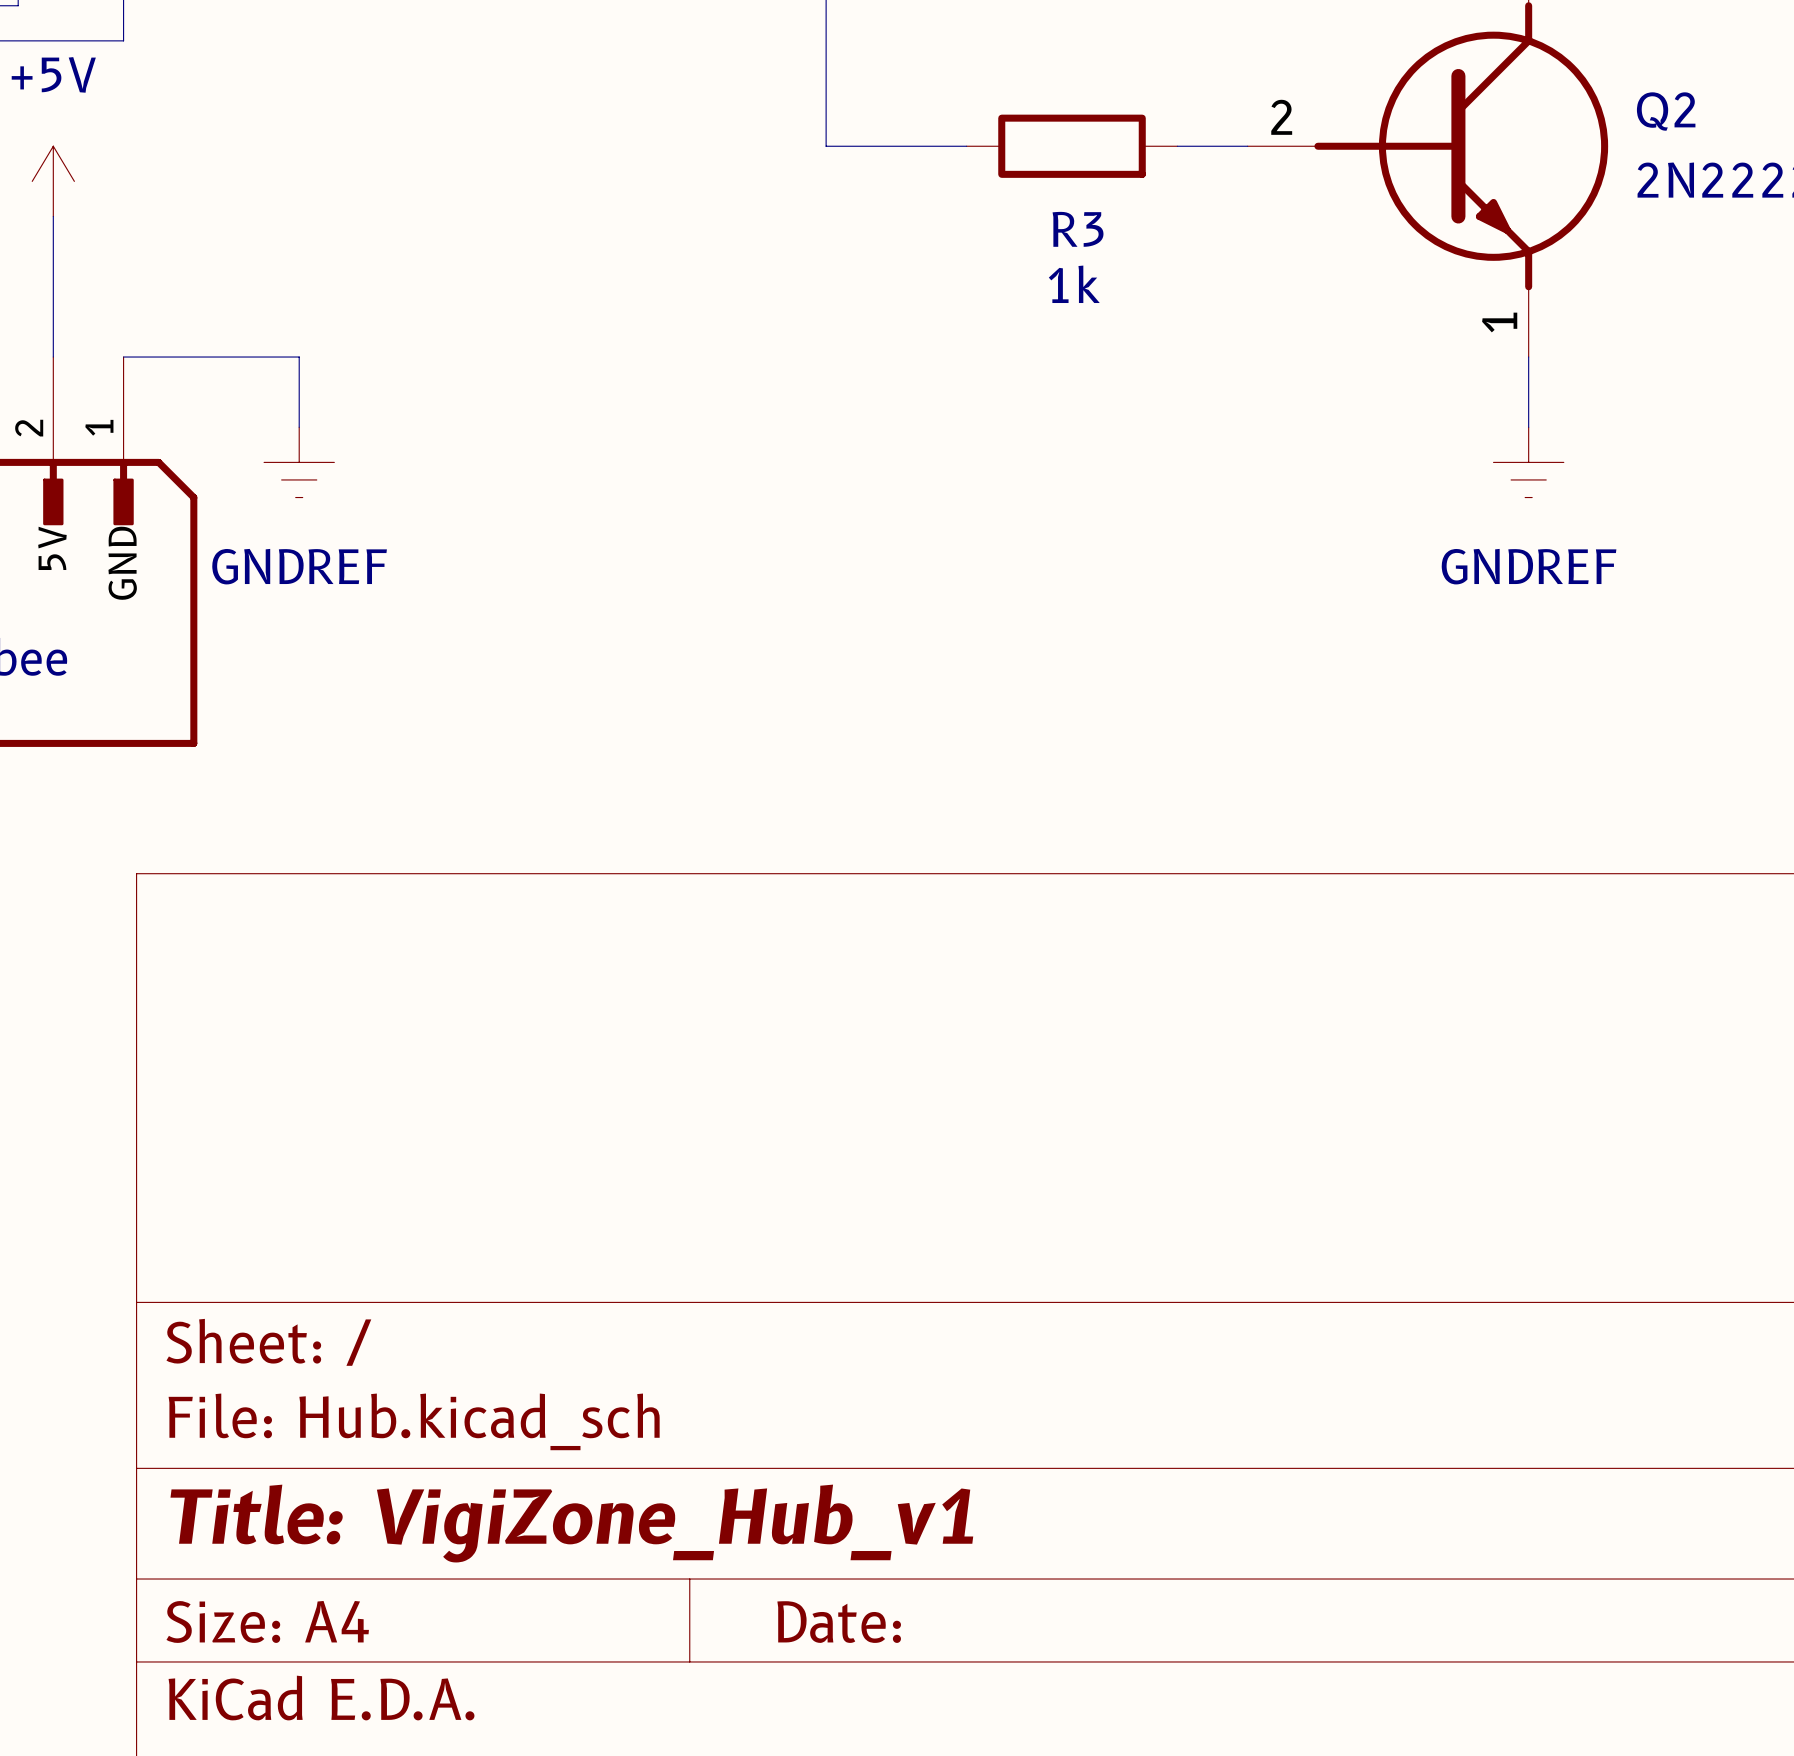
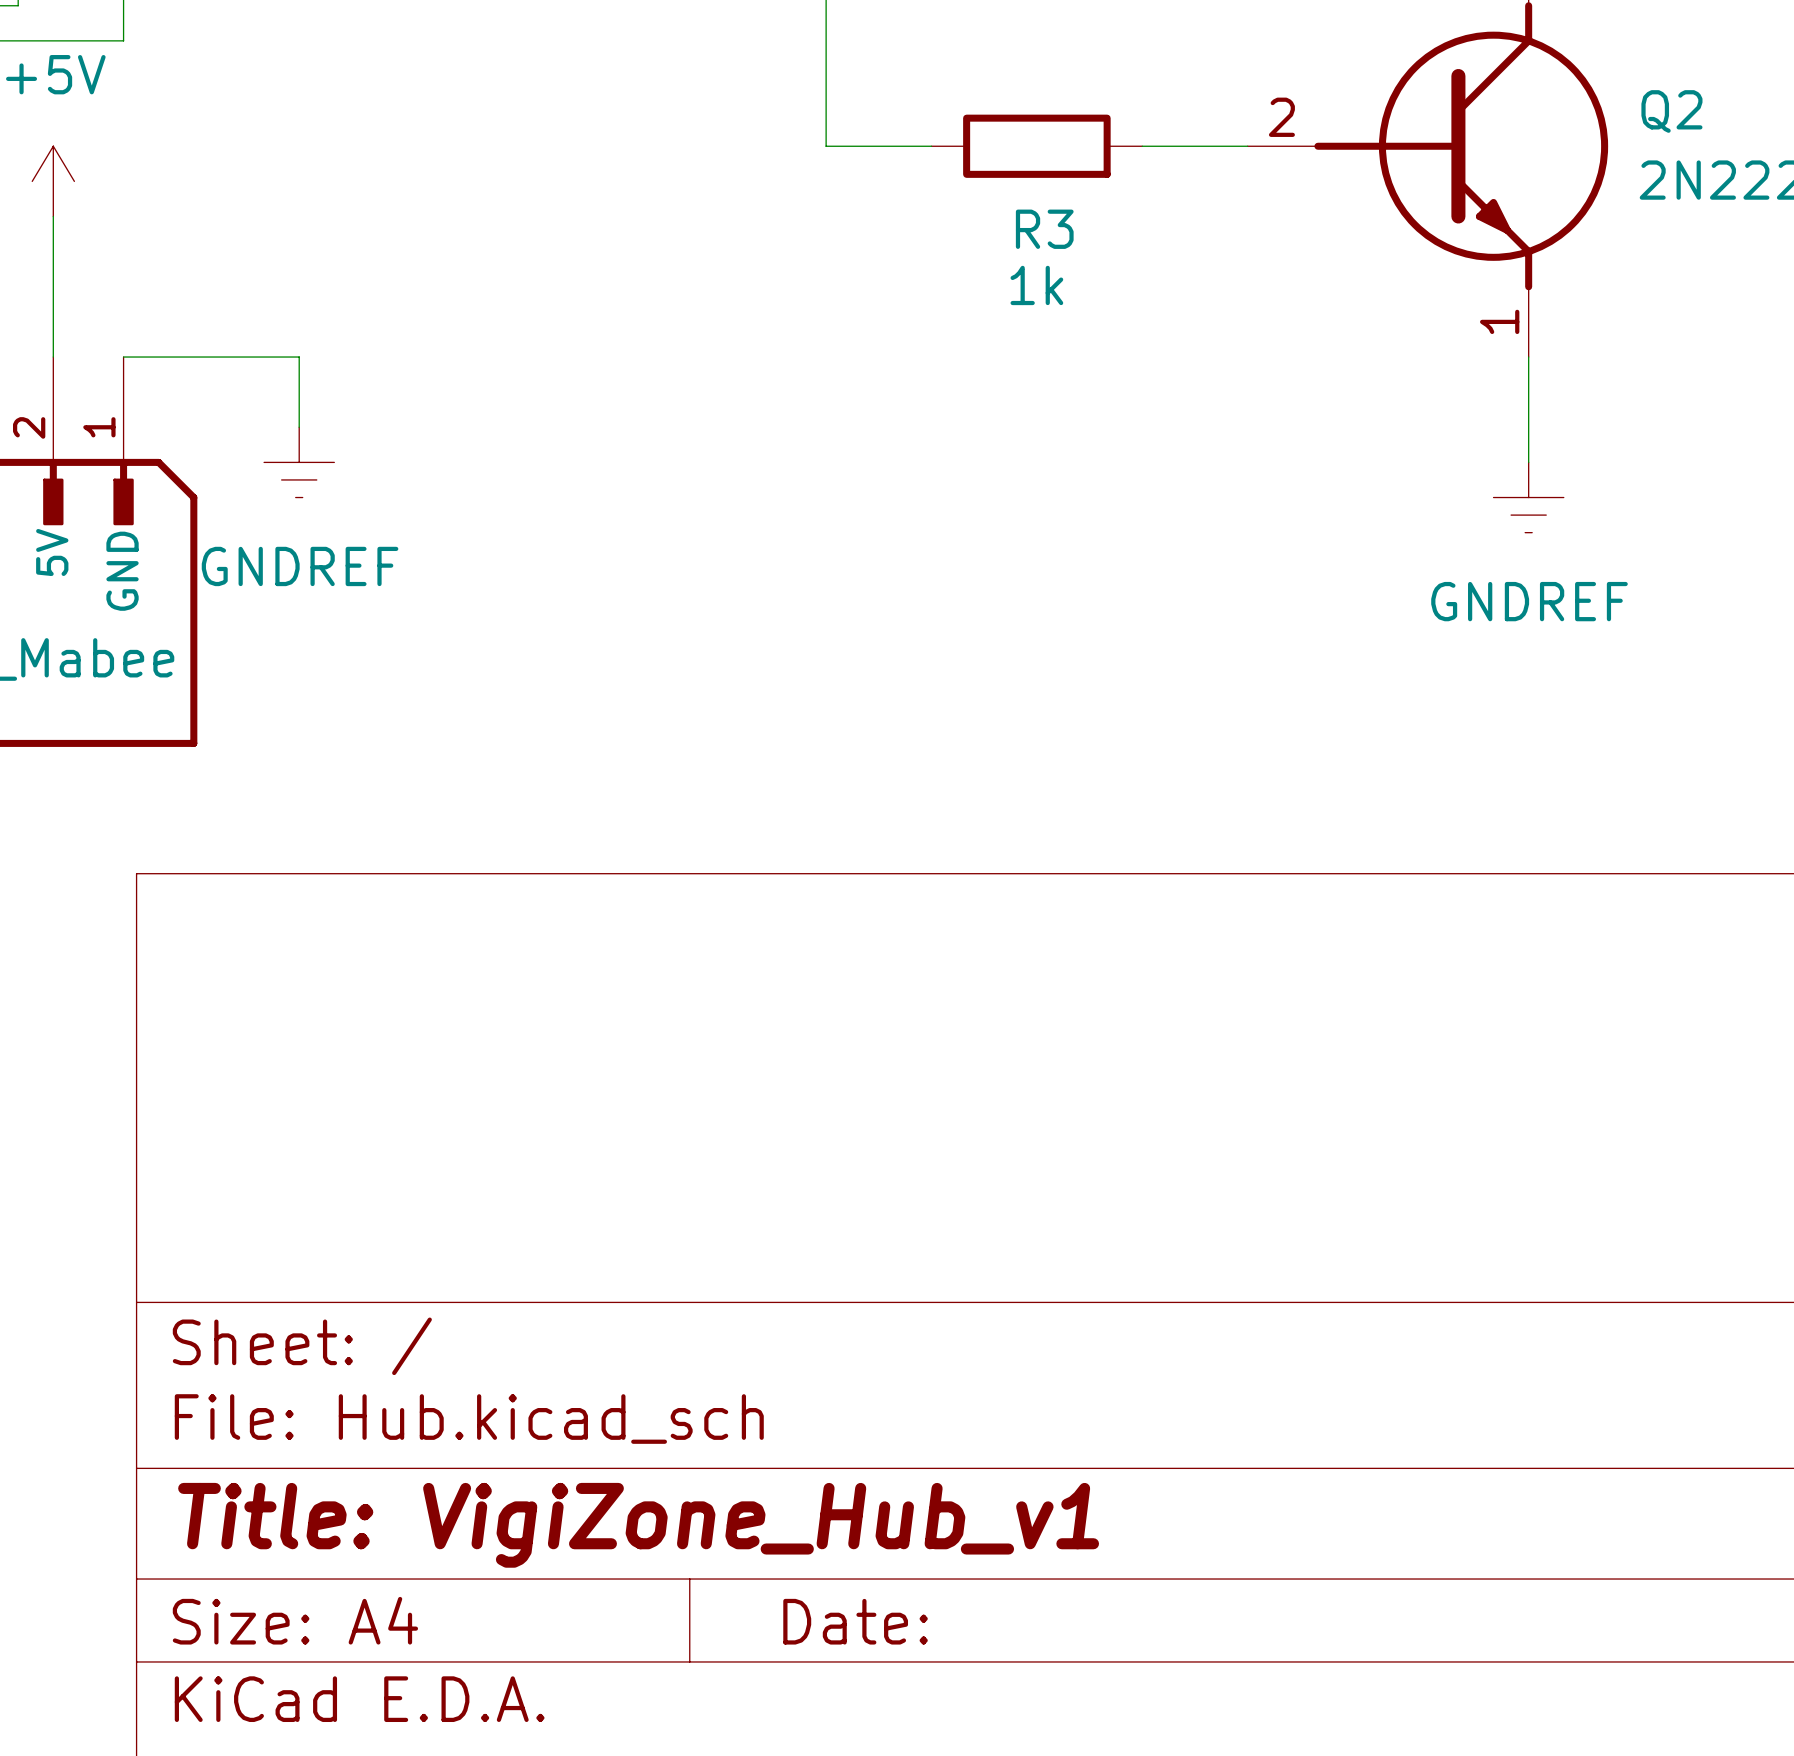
R3 position: (1072, 146) -> (1036, 146)
power symbol position: GNDREF (1528, 462) -> GNDREF (1528, 497)

